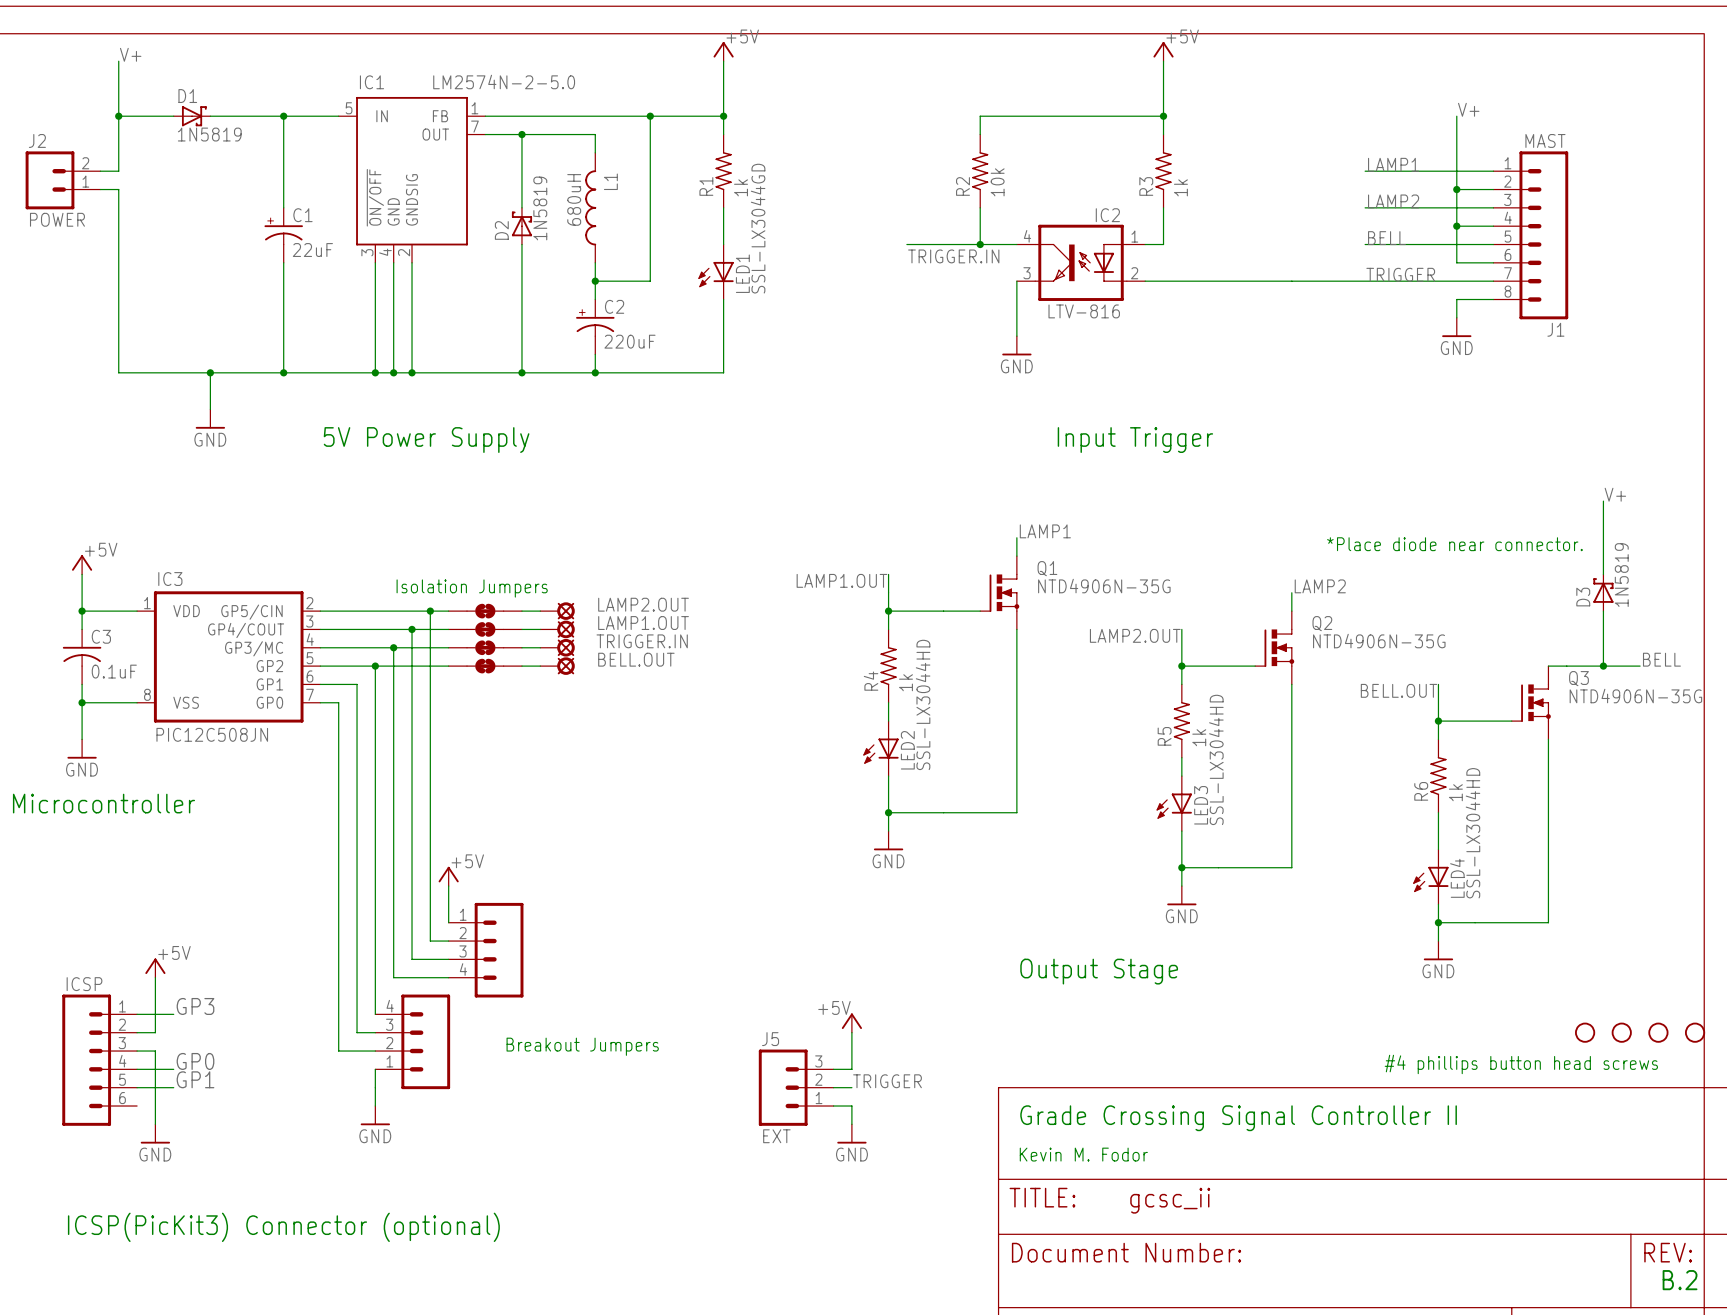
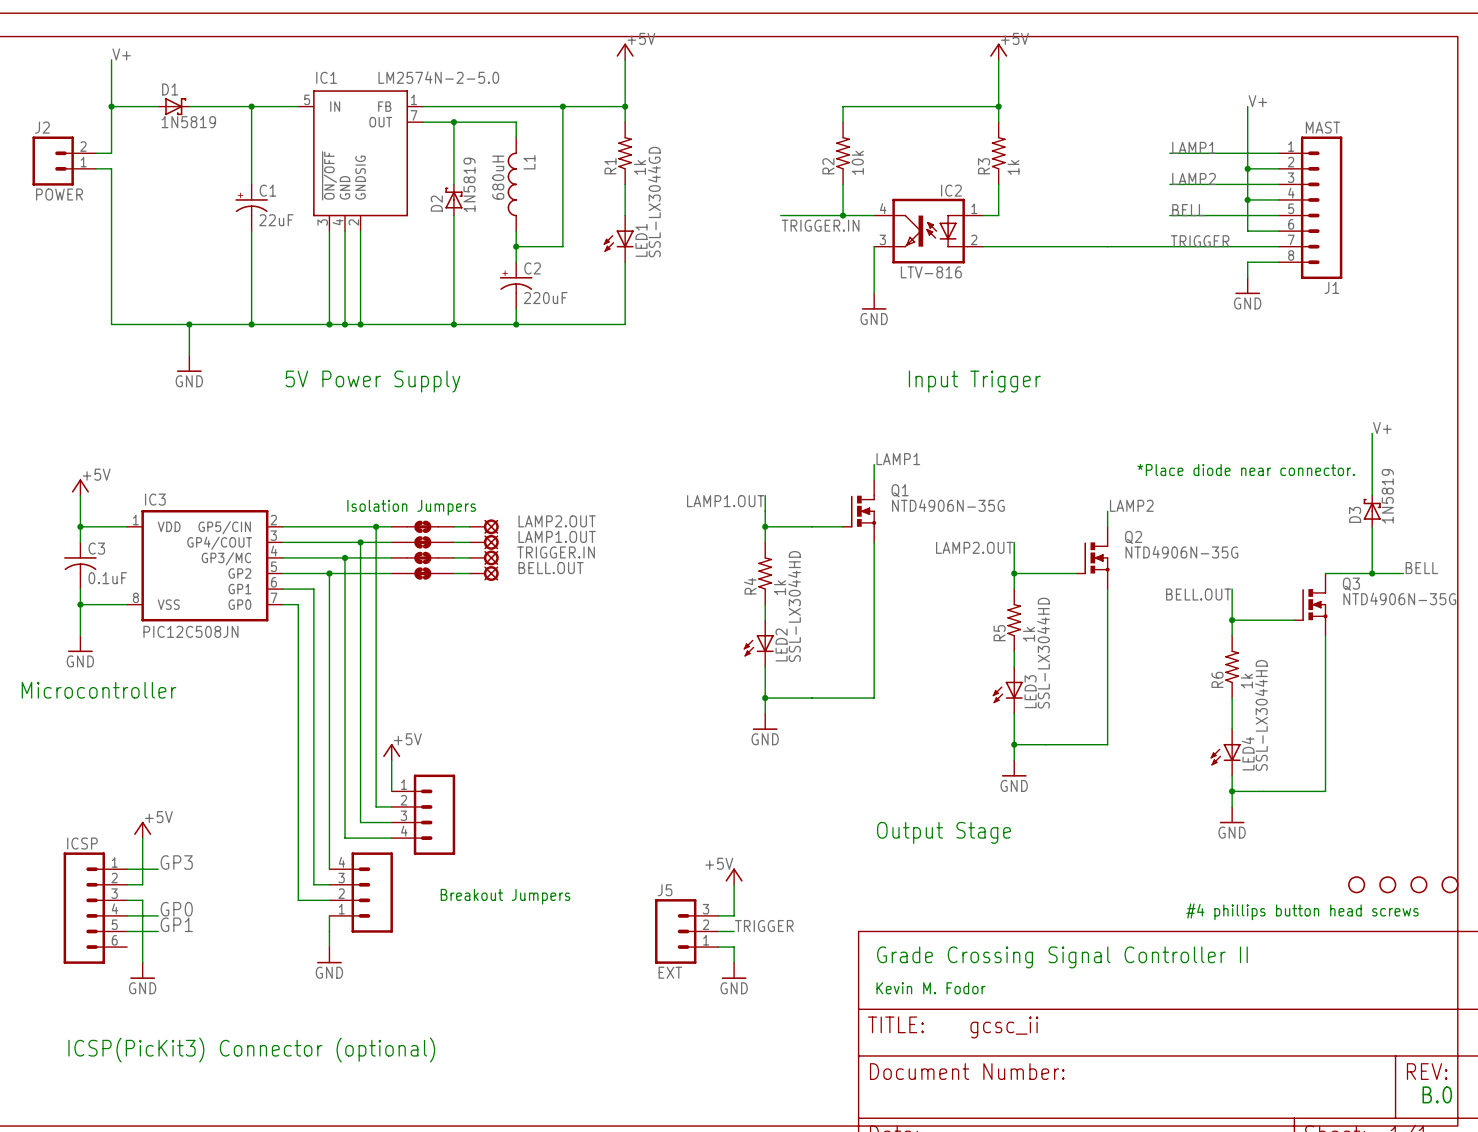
text: B.2 (1680, 1280) -> B.0 (1437, 1094)

